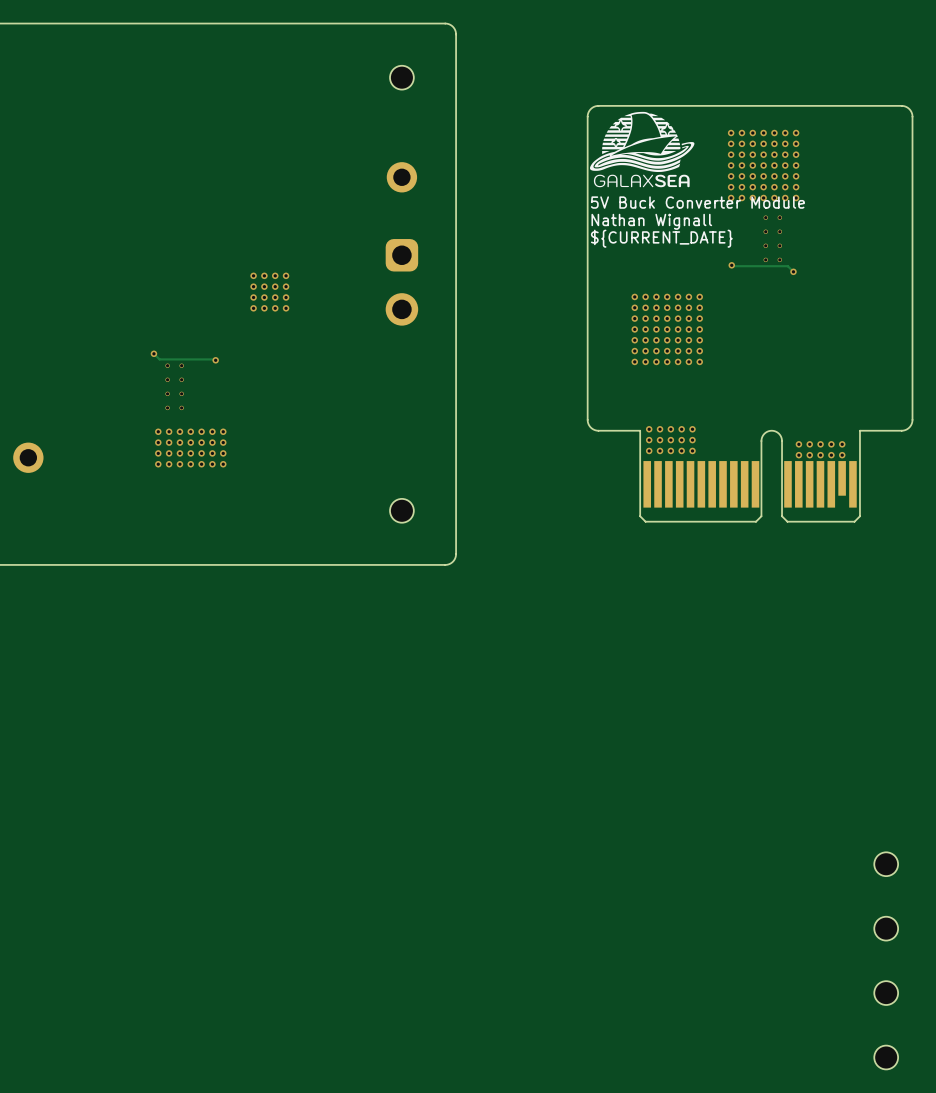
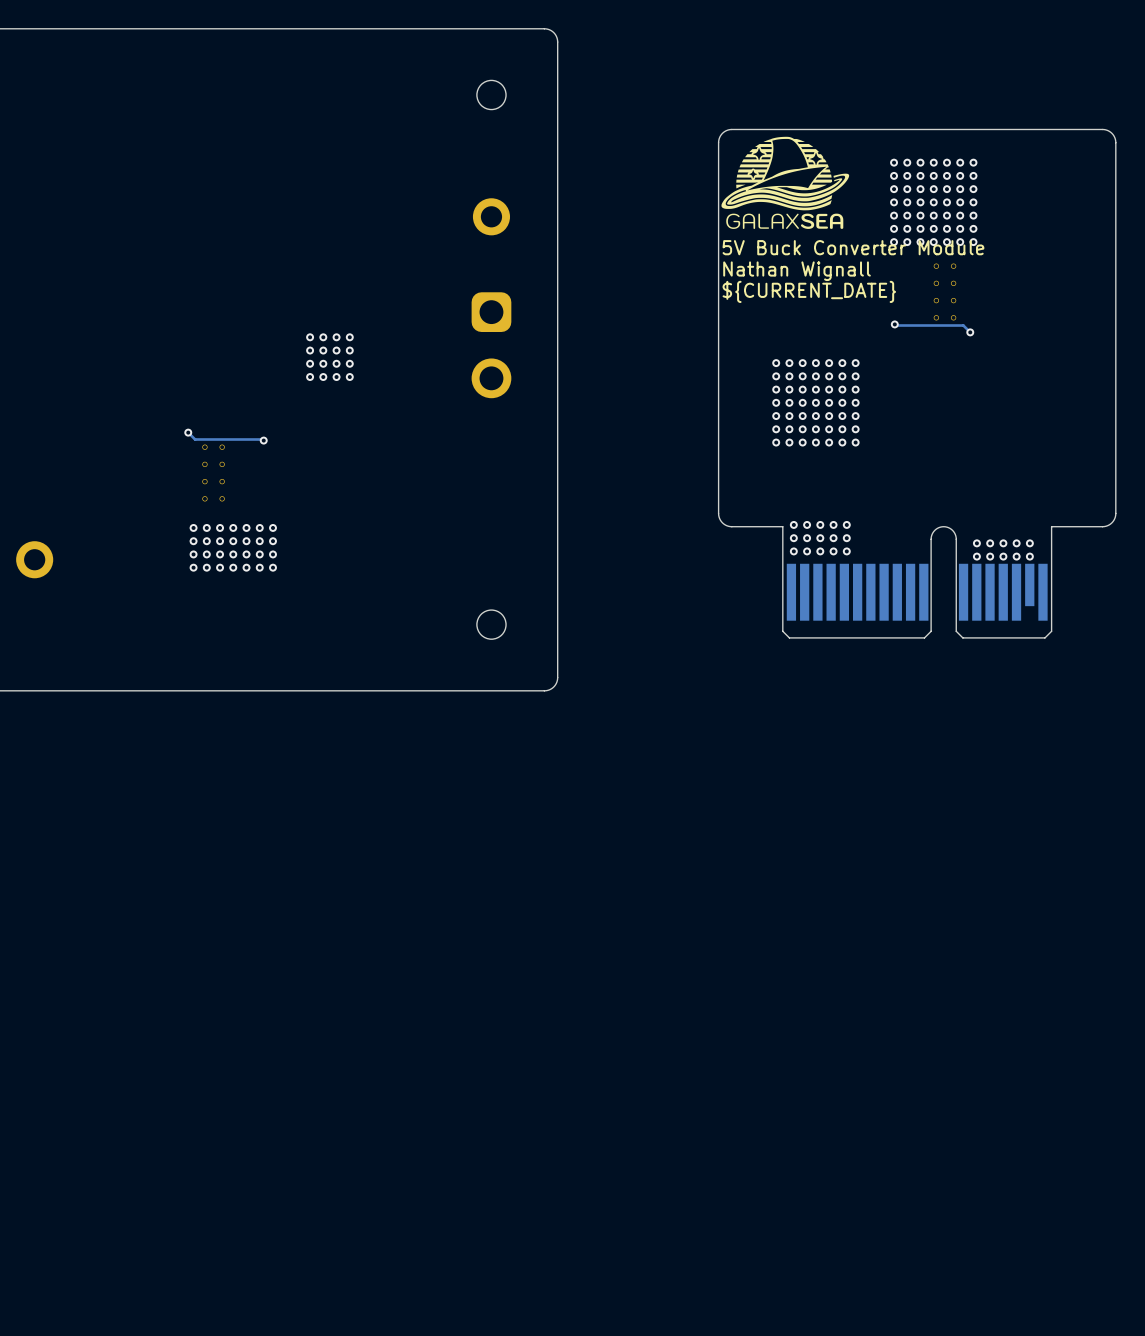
part: (886, 864) -> none
part: (886, 928) -> none
part: (886, 993) -> none
part: (886, 1057) -> none

